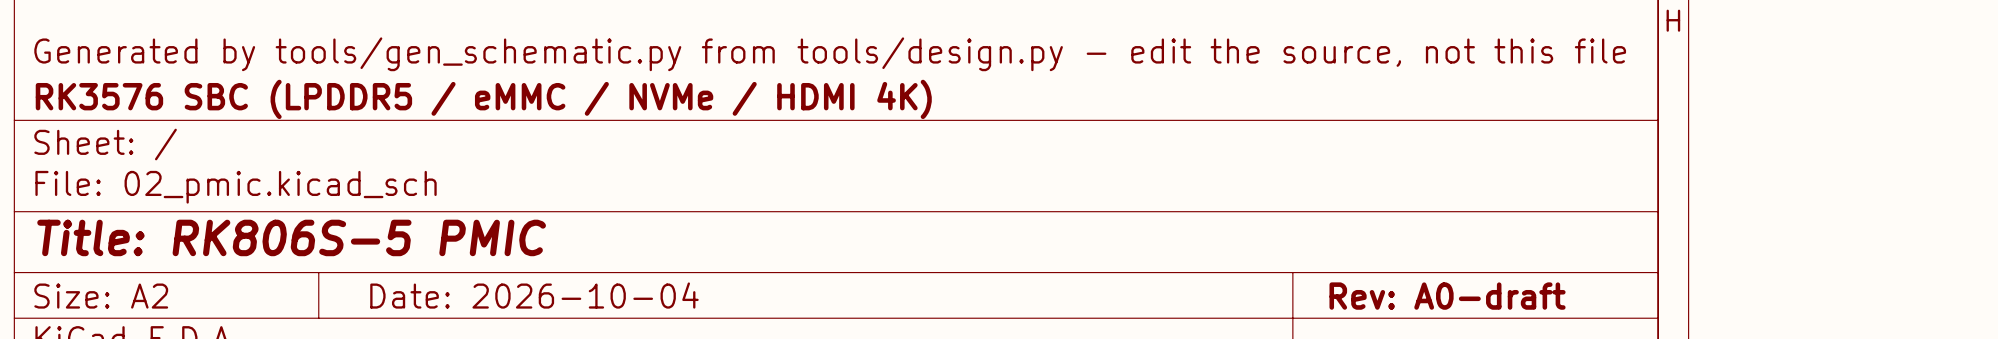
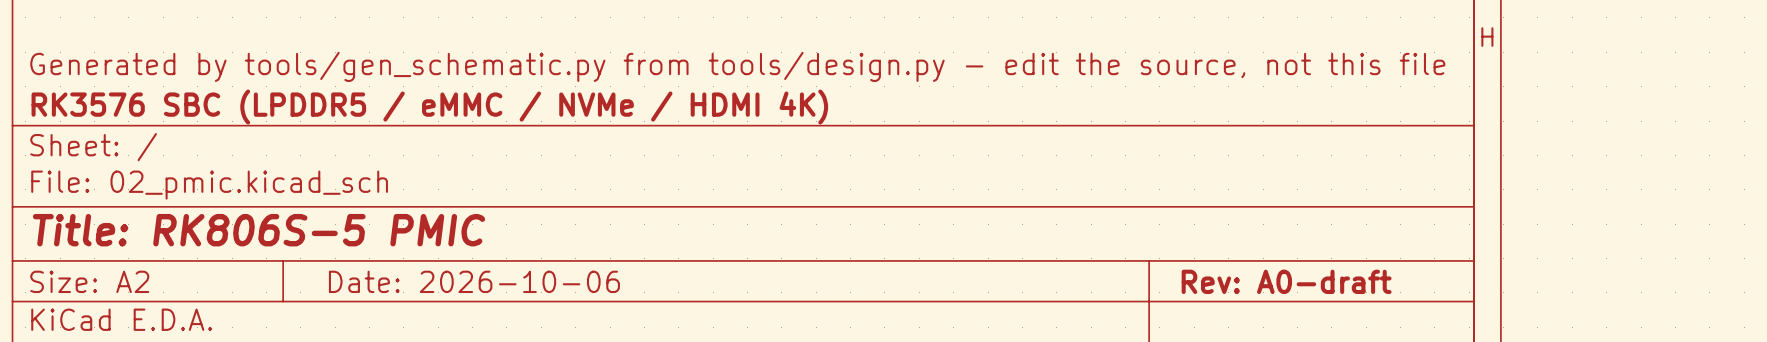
title block: Date: 2026-10-04 (534, 295) -> Date: 2026-10-06 (474, 281)

